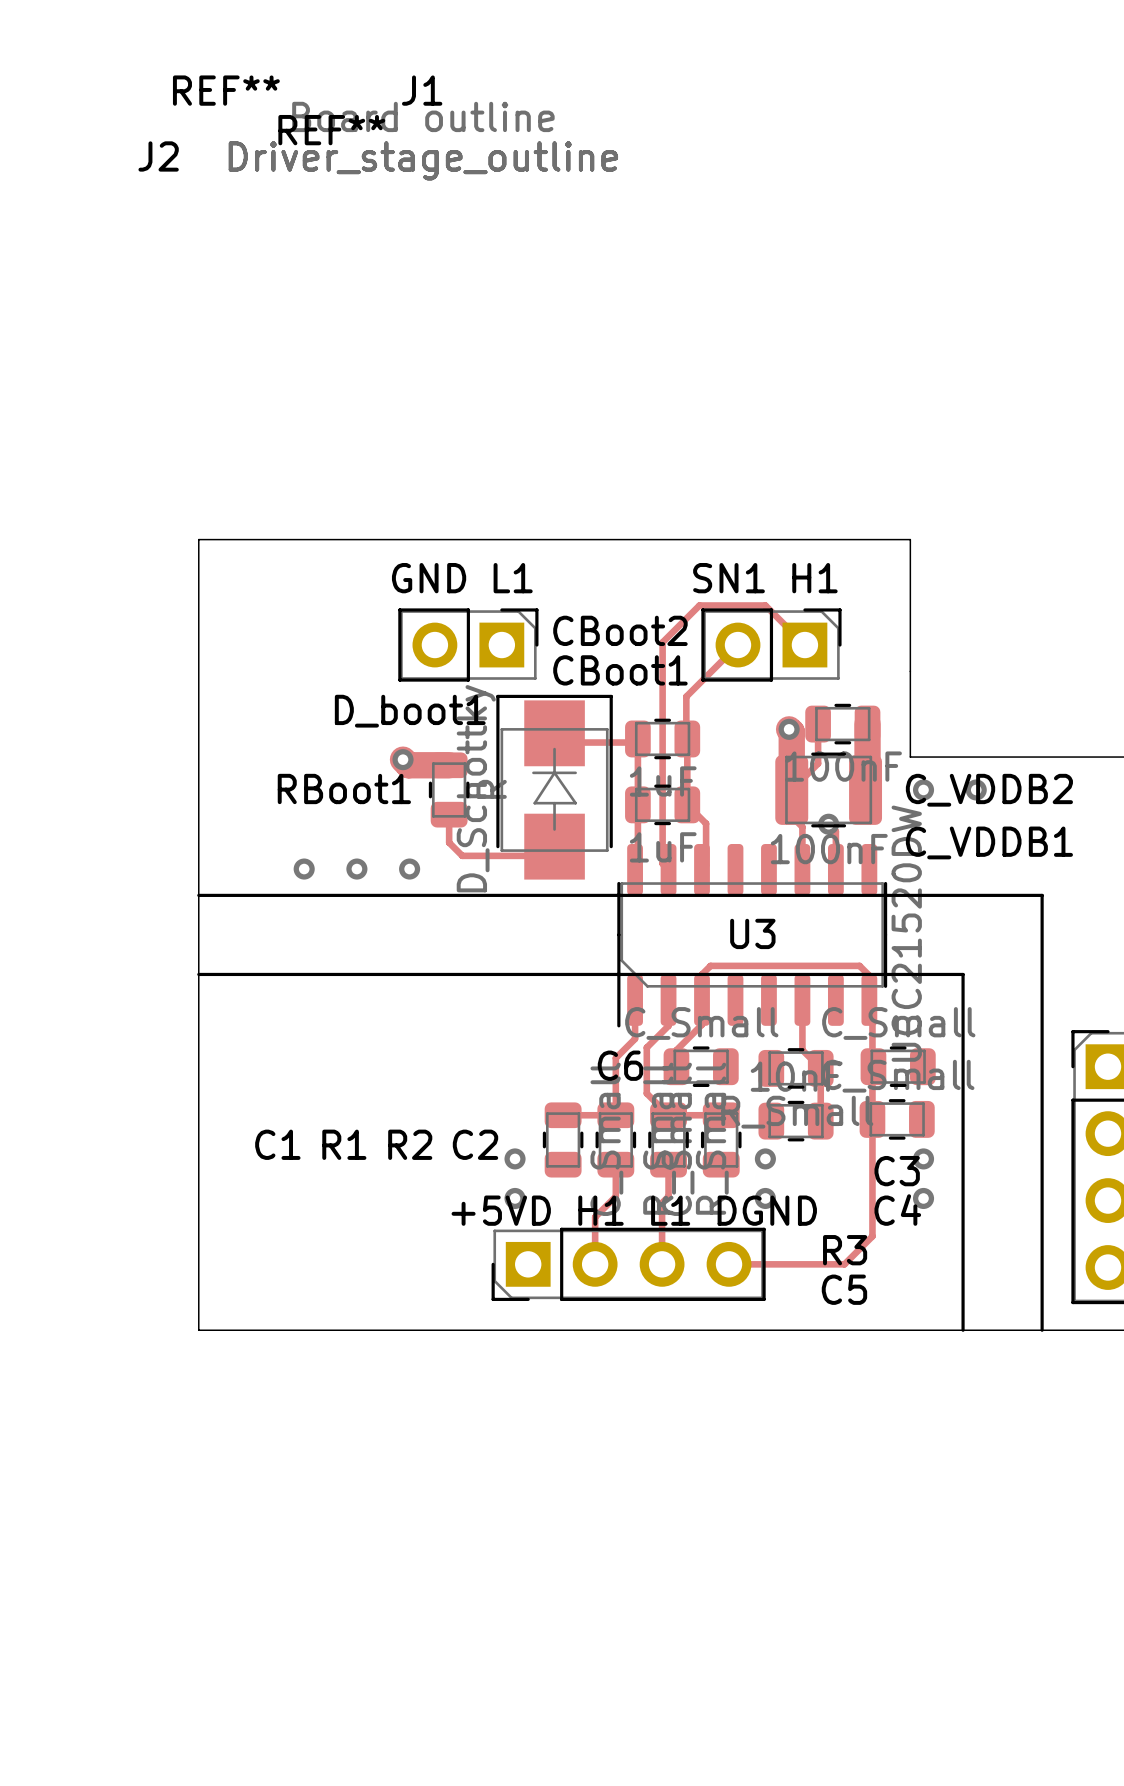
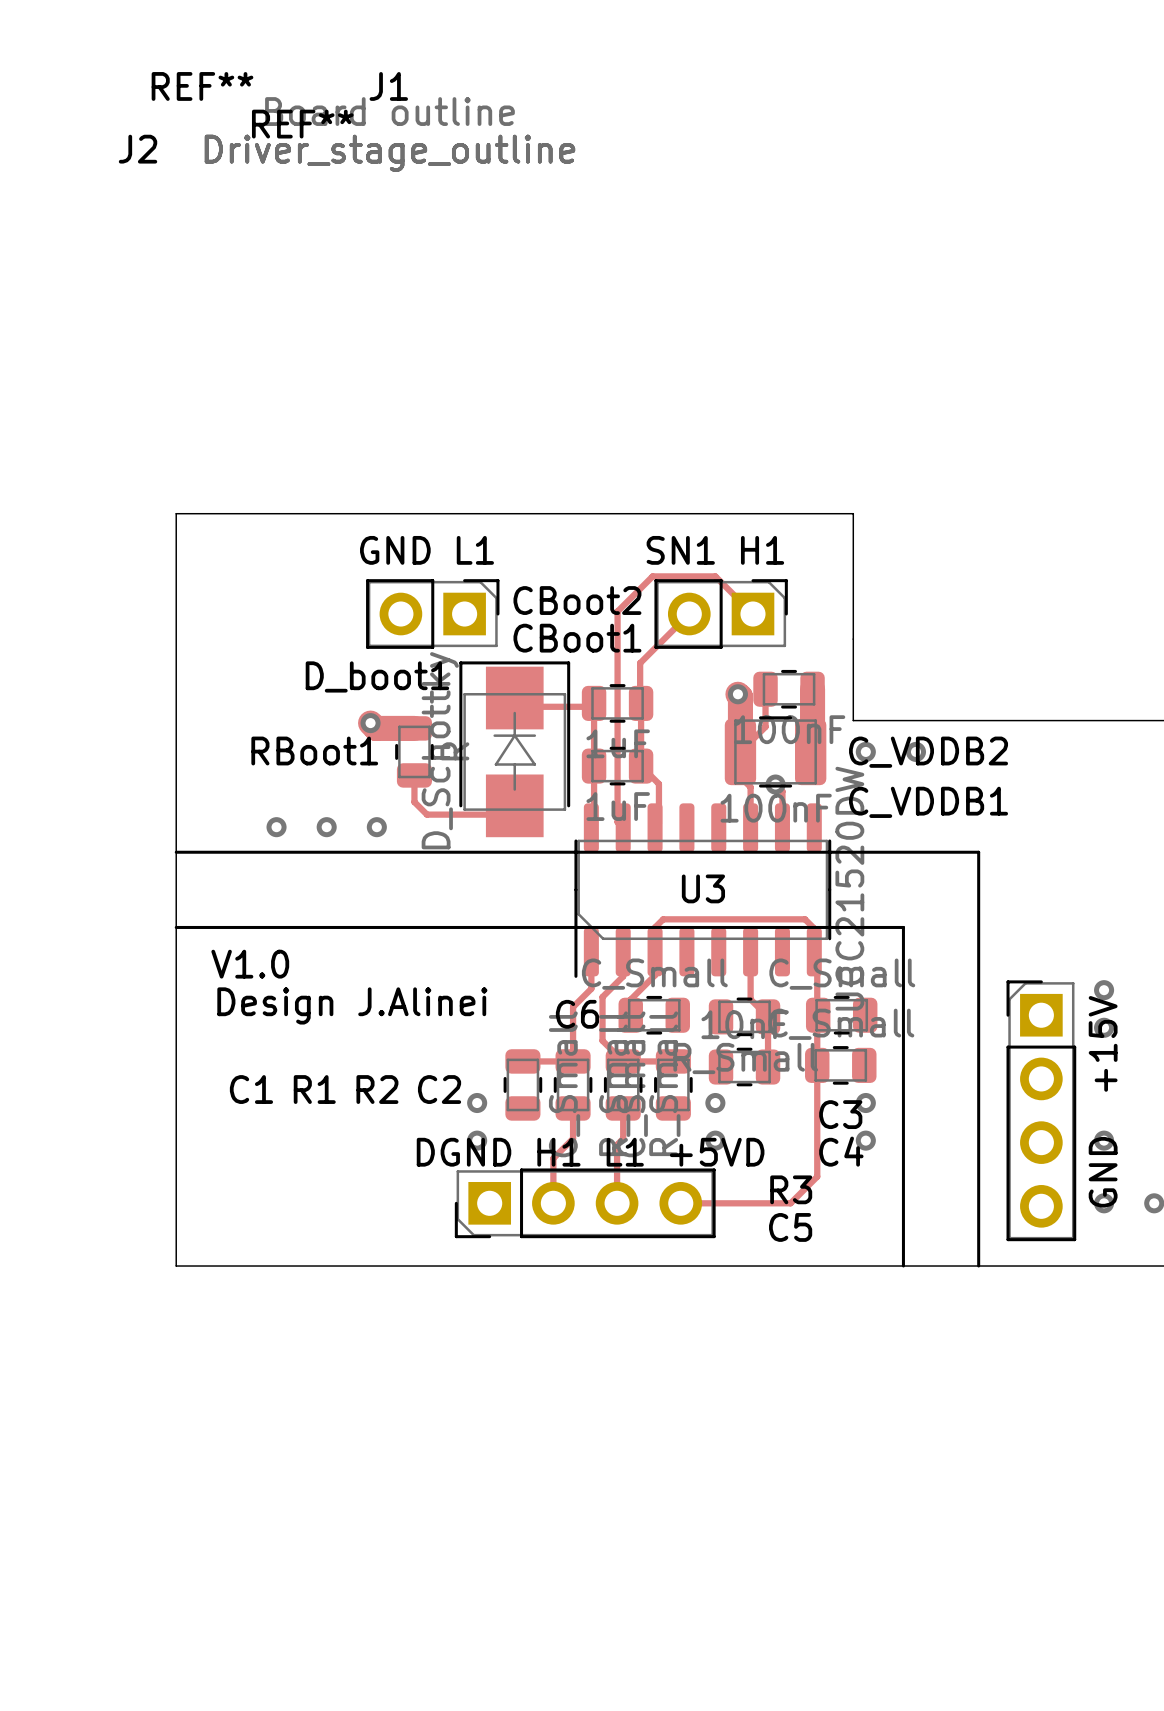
text: none -> V1.0 (250, 964)
text: none -> Design J.Alinei (352, 1005)
J2 text: +5VD H1 L1 DGND (634, 1210) -> DGND H1 L1 +5VD (590, 1152)

